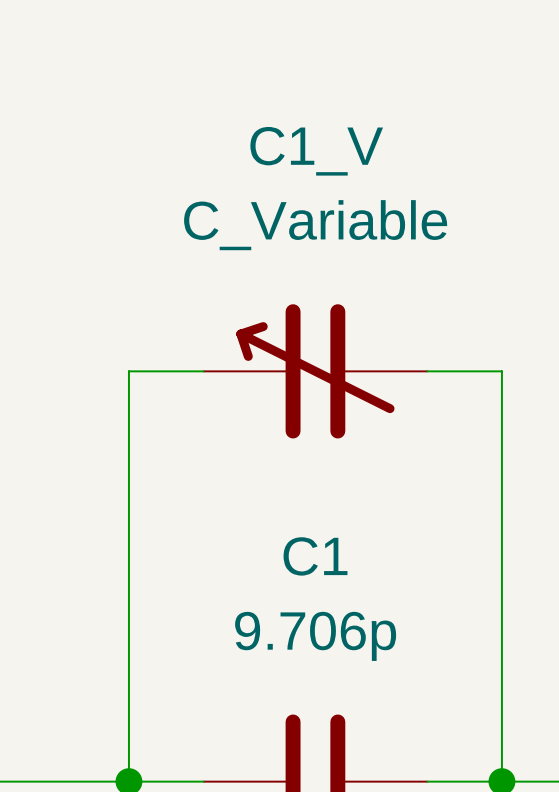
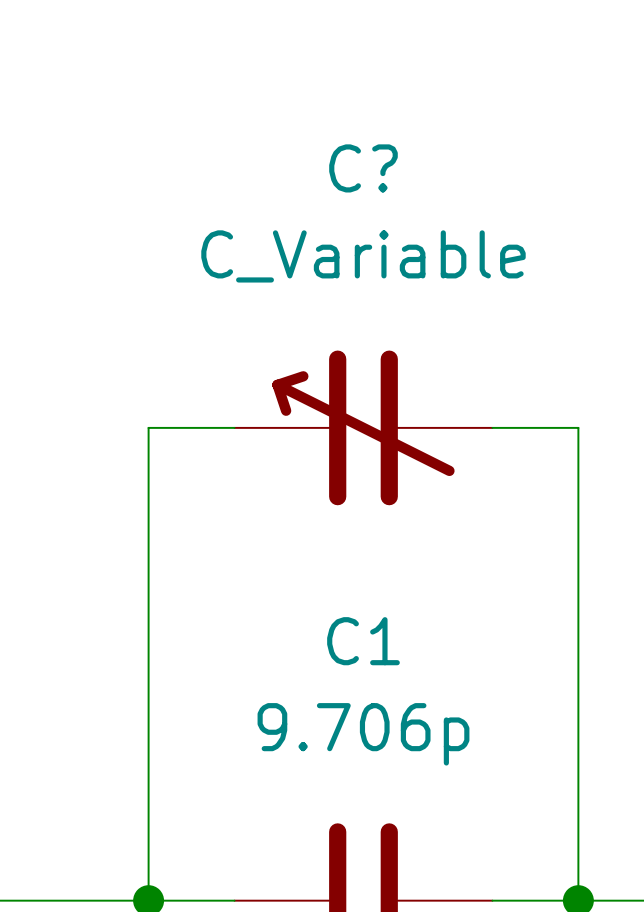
C1_V name: C1_V (316, 151) -> C? (363, 168)

